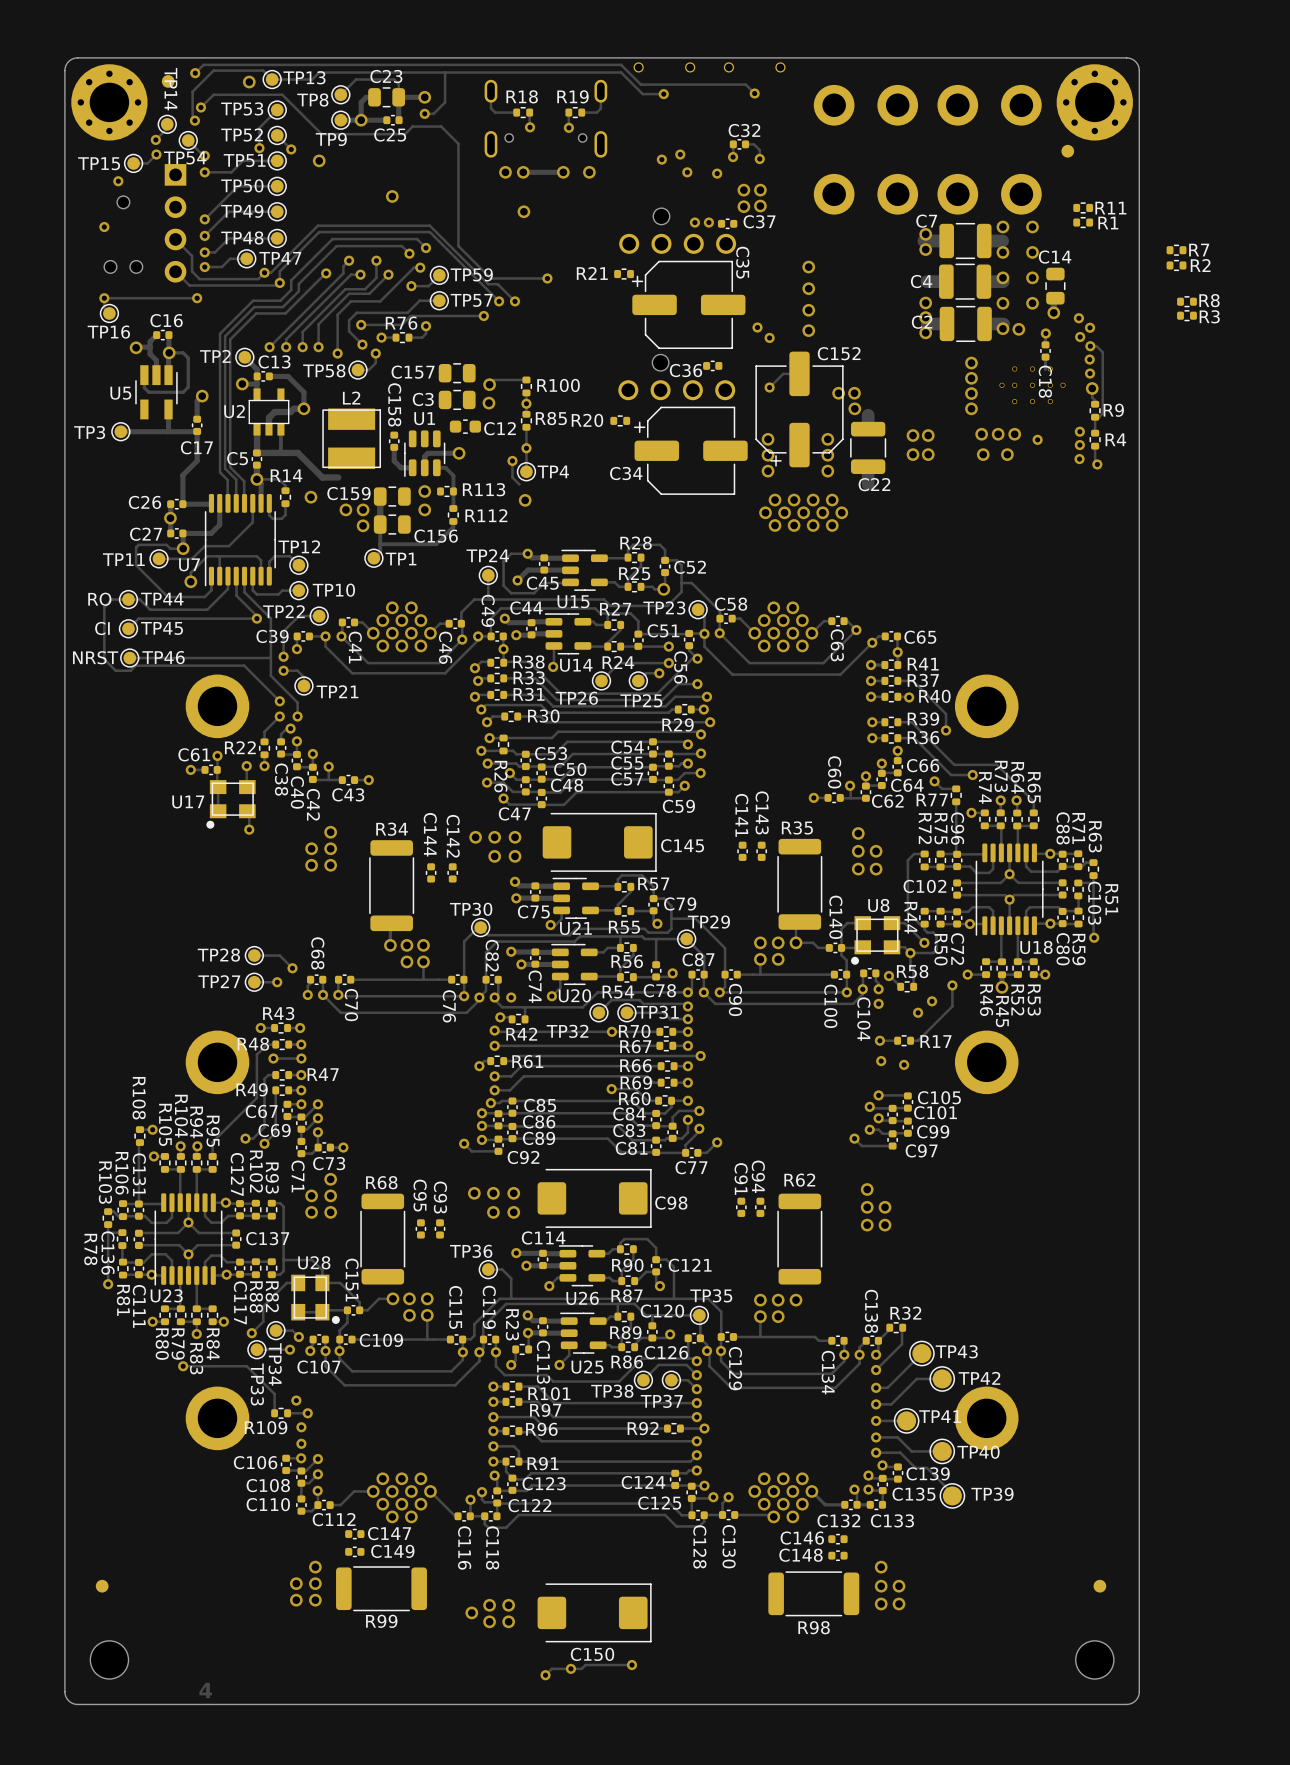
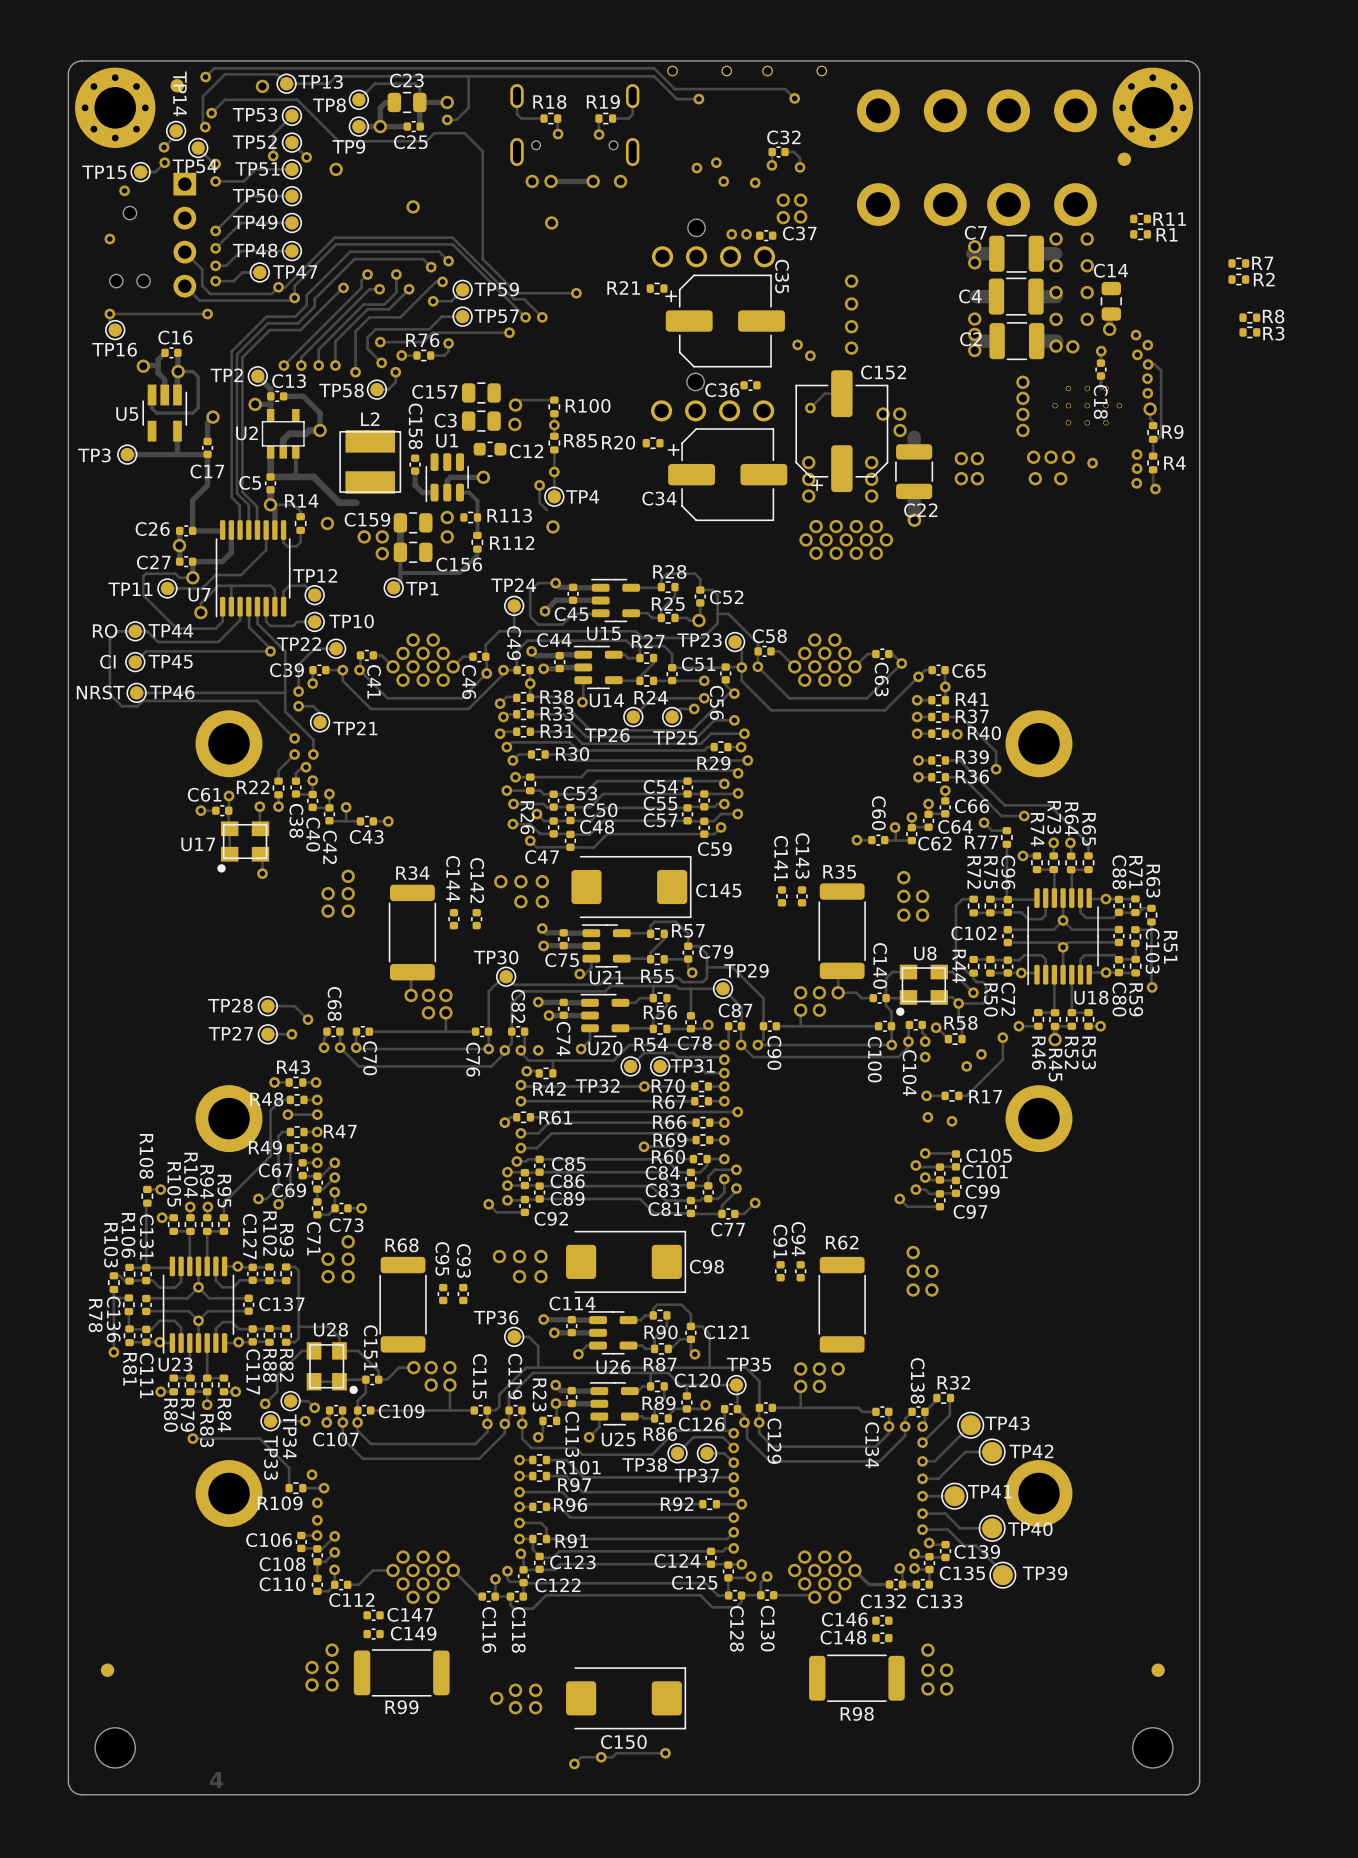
via: none -> (914, 520)

